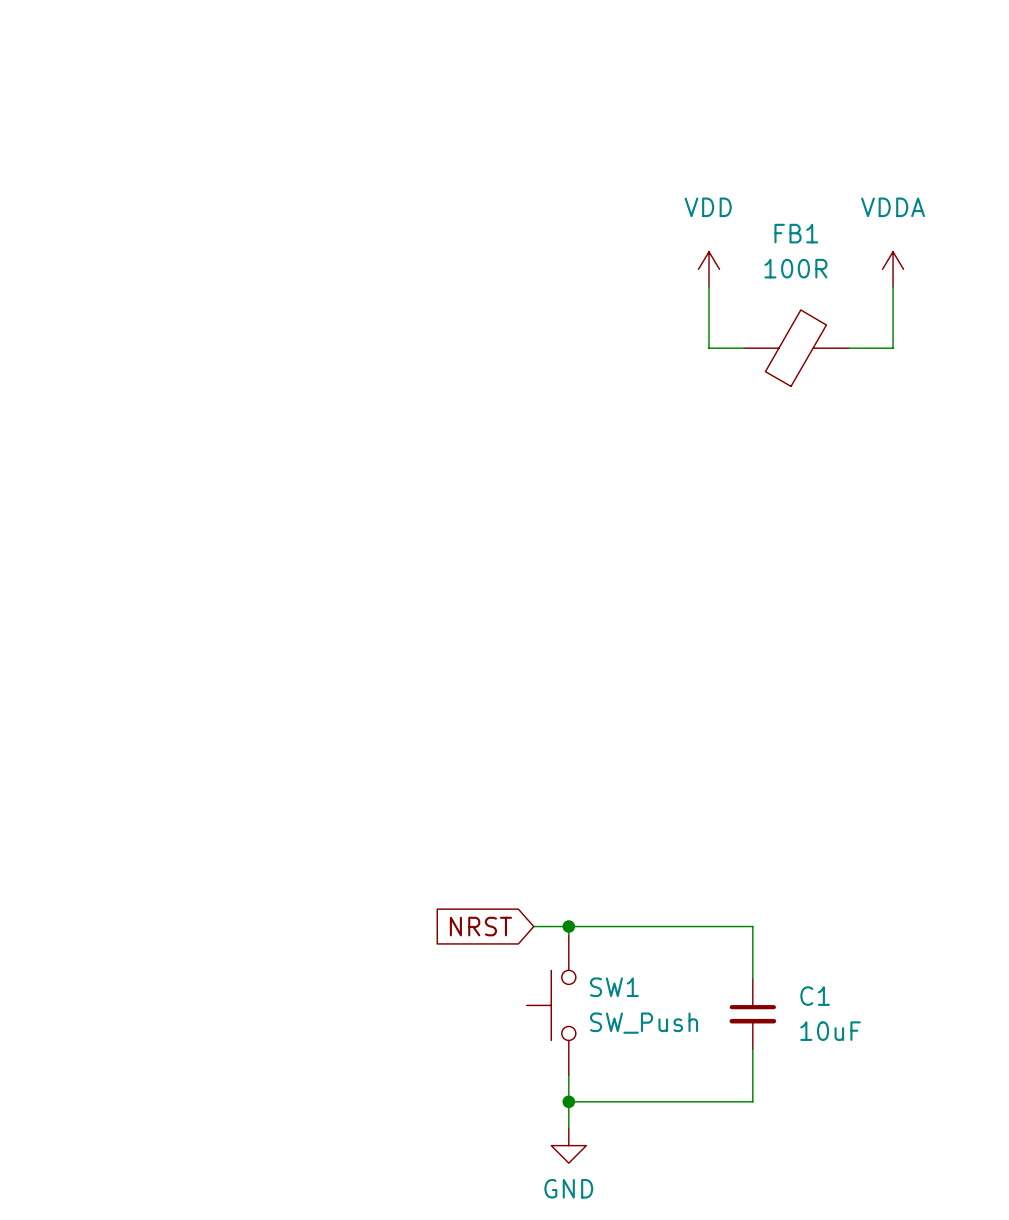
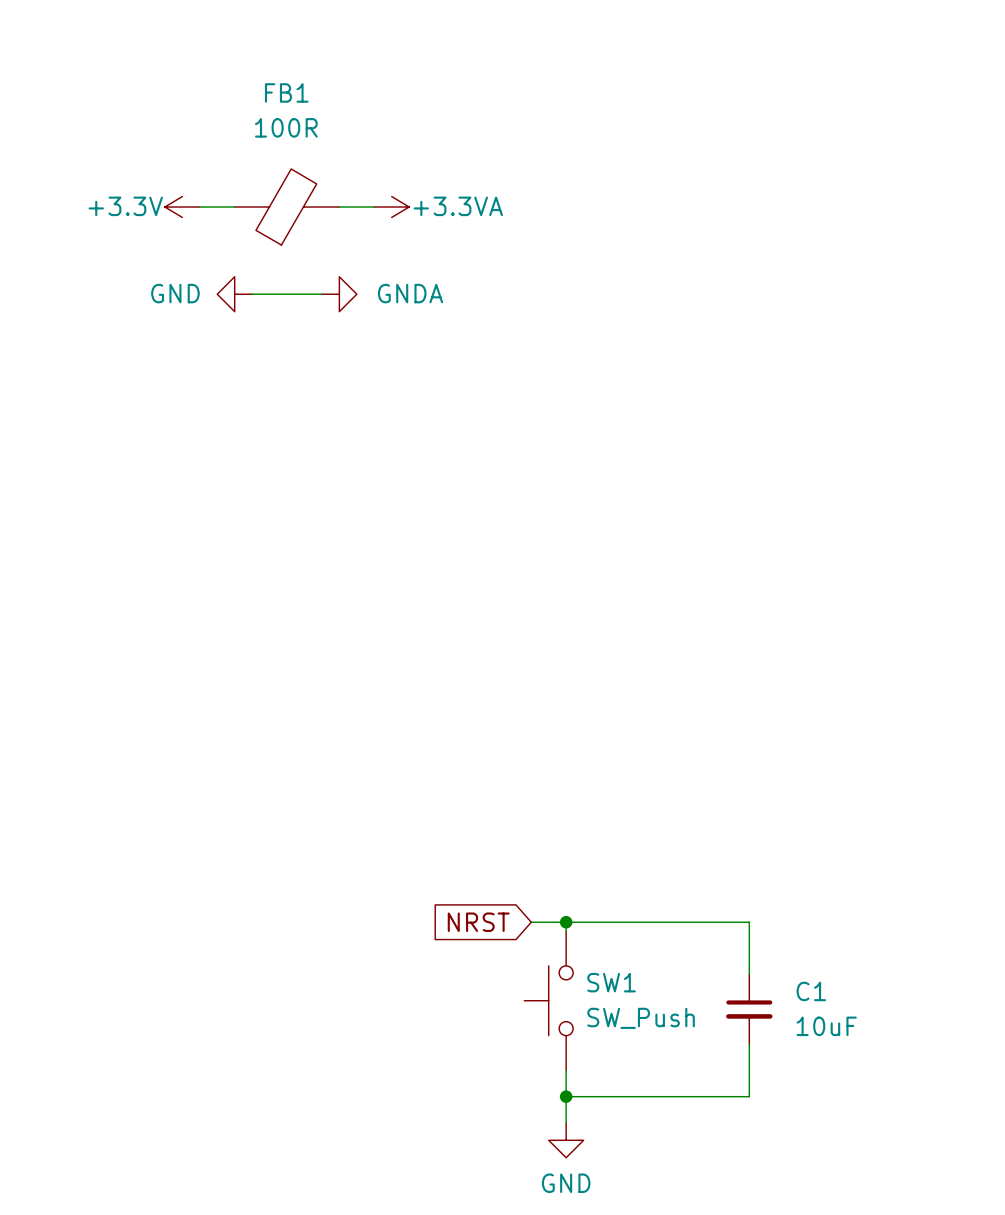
power symbol: none -> +3.3V (182, 207)
wire: none -> (199, 207) (234, 207)
wire: none -> (339, 207) (374, 207)
power symbol: none -> +3.3VA (391, 207)
power symbol: VDD (709, 269) -> none
power symbol: VDDA (893, 269) -> none
wire: (709, 286) (709, 348) (744, 348) -> none
wire: (893, 286) (893, 348) (849, 348) -> none
power symbol: none -> GND (234, 294)
wire: none -> (252, 294) (321, 294)
power symbol: none -> GNDA (339, 294)
FB1 position: (796, 348) -> (287, 207)

